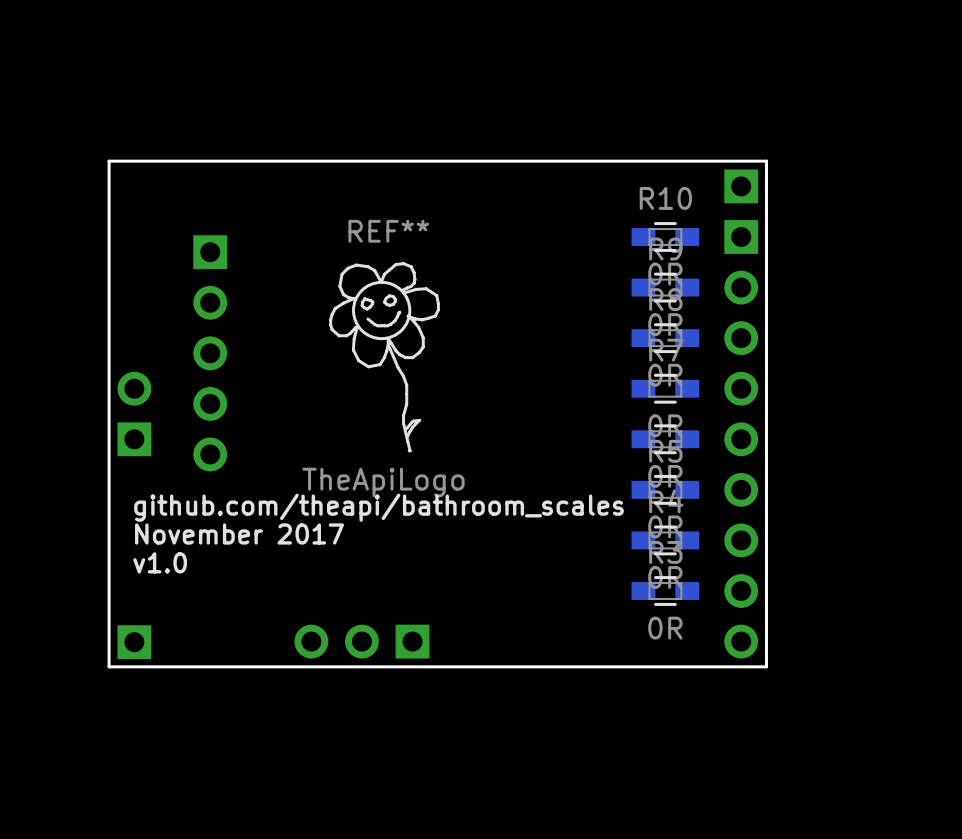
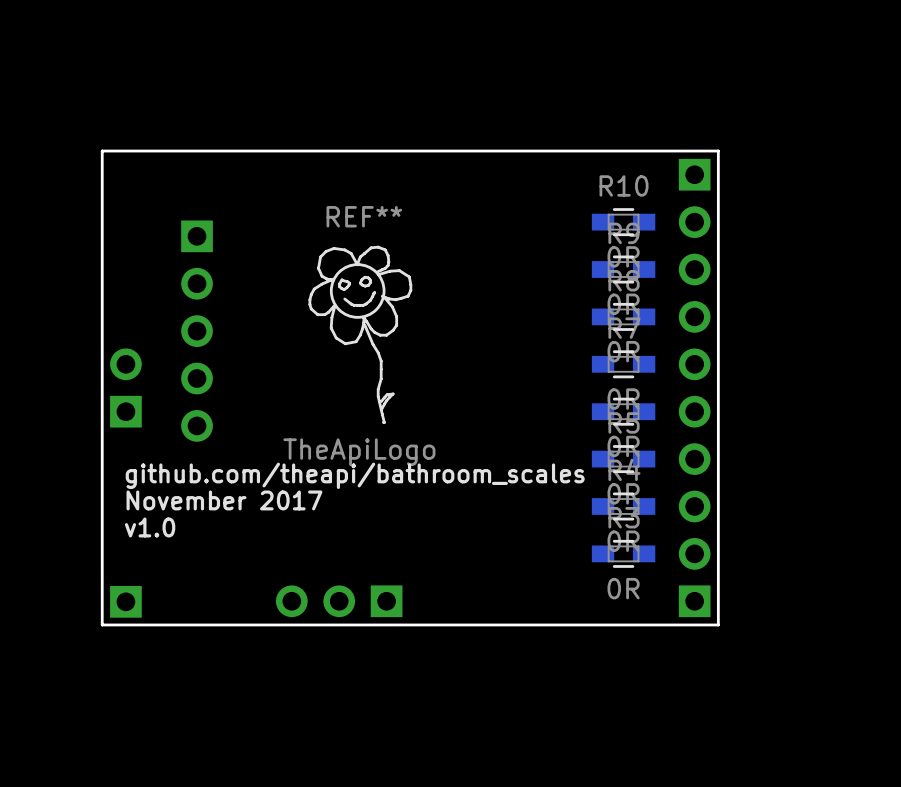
part rotation: 0° (741, 439) -> 180° (694, 411)

